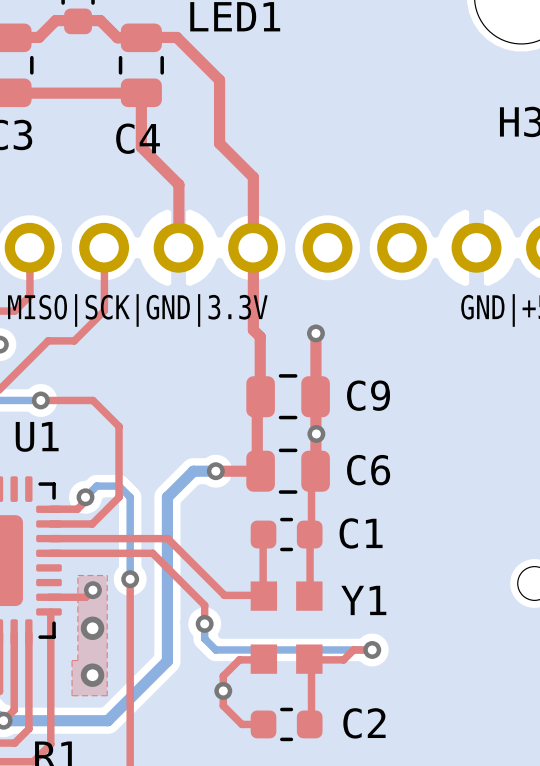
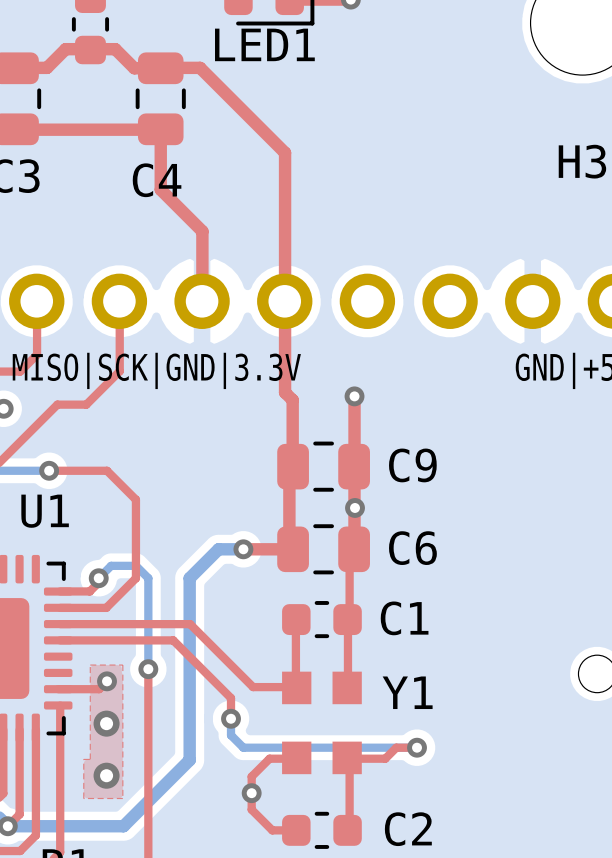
top track: (219, 80) (219, 143) (253, 177) -> (247, 115) (285, 152) (285, 223)

